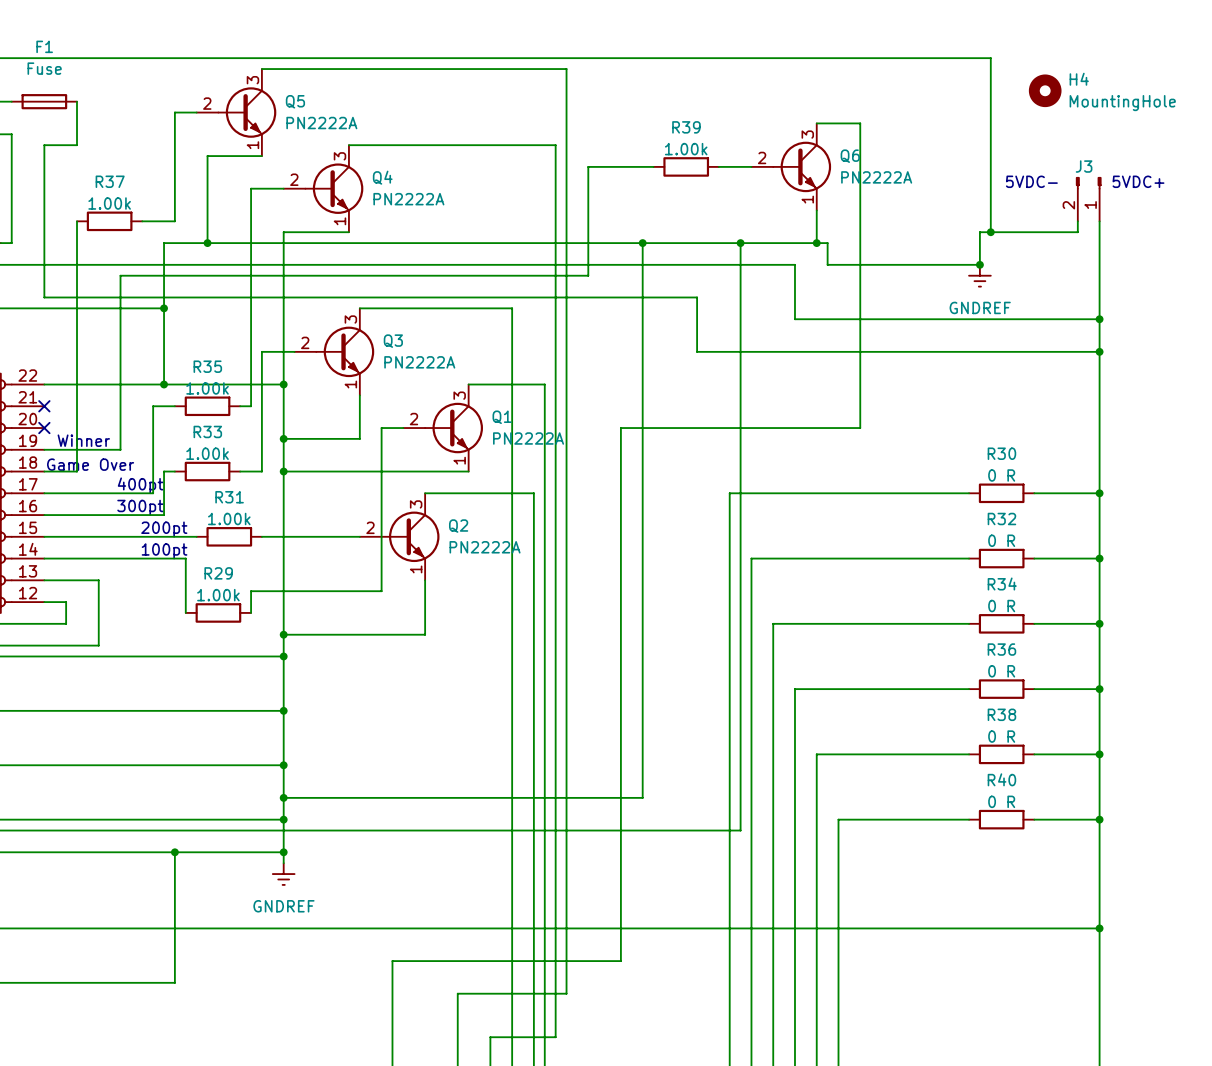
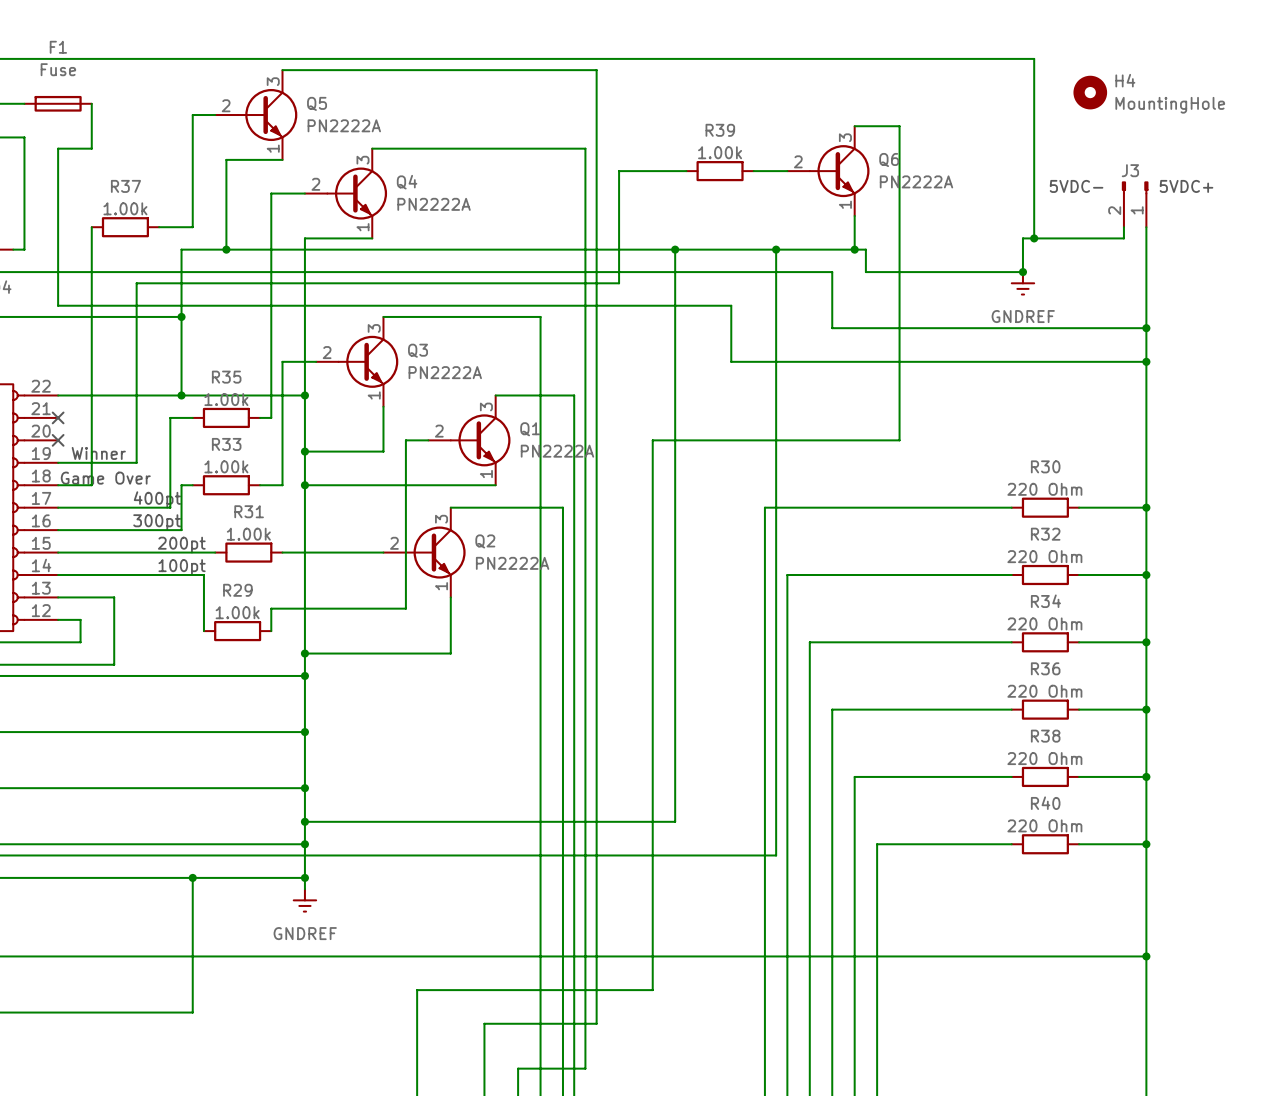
R30 value: 0 R (1001, 475) -> 220 Ohm (1044, 489)
R32 value: 0 R (1001, 540) -> 220 Ohm (1044, 556)
R34 value: 0 R (1001, 606) -> 220 Ohm (1044, 623)
R36 value: 0 R (1001, 671) -> 220 Ohm (1044, 691)
R38 value: 0 R (1001, 736) -> 220 Ohm (1044, 758)
R40 value: 0 R (1001, 801) -> 220 Ohm (1044, 825)

